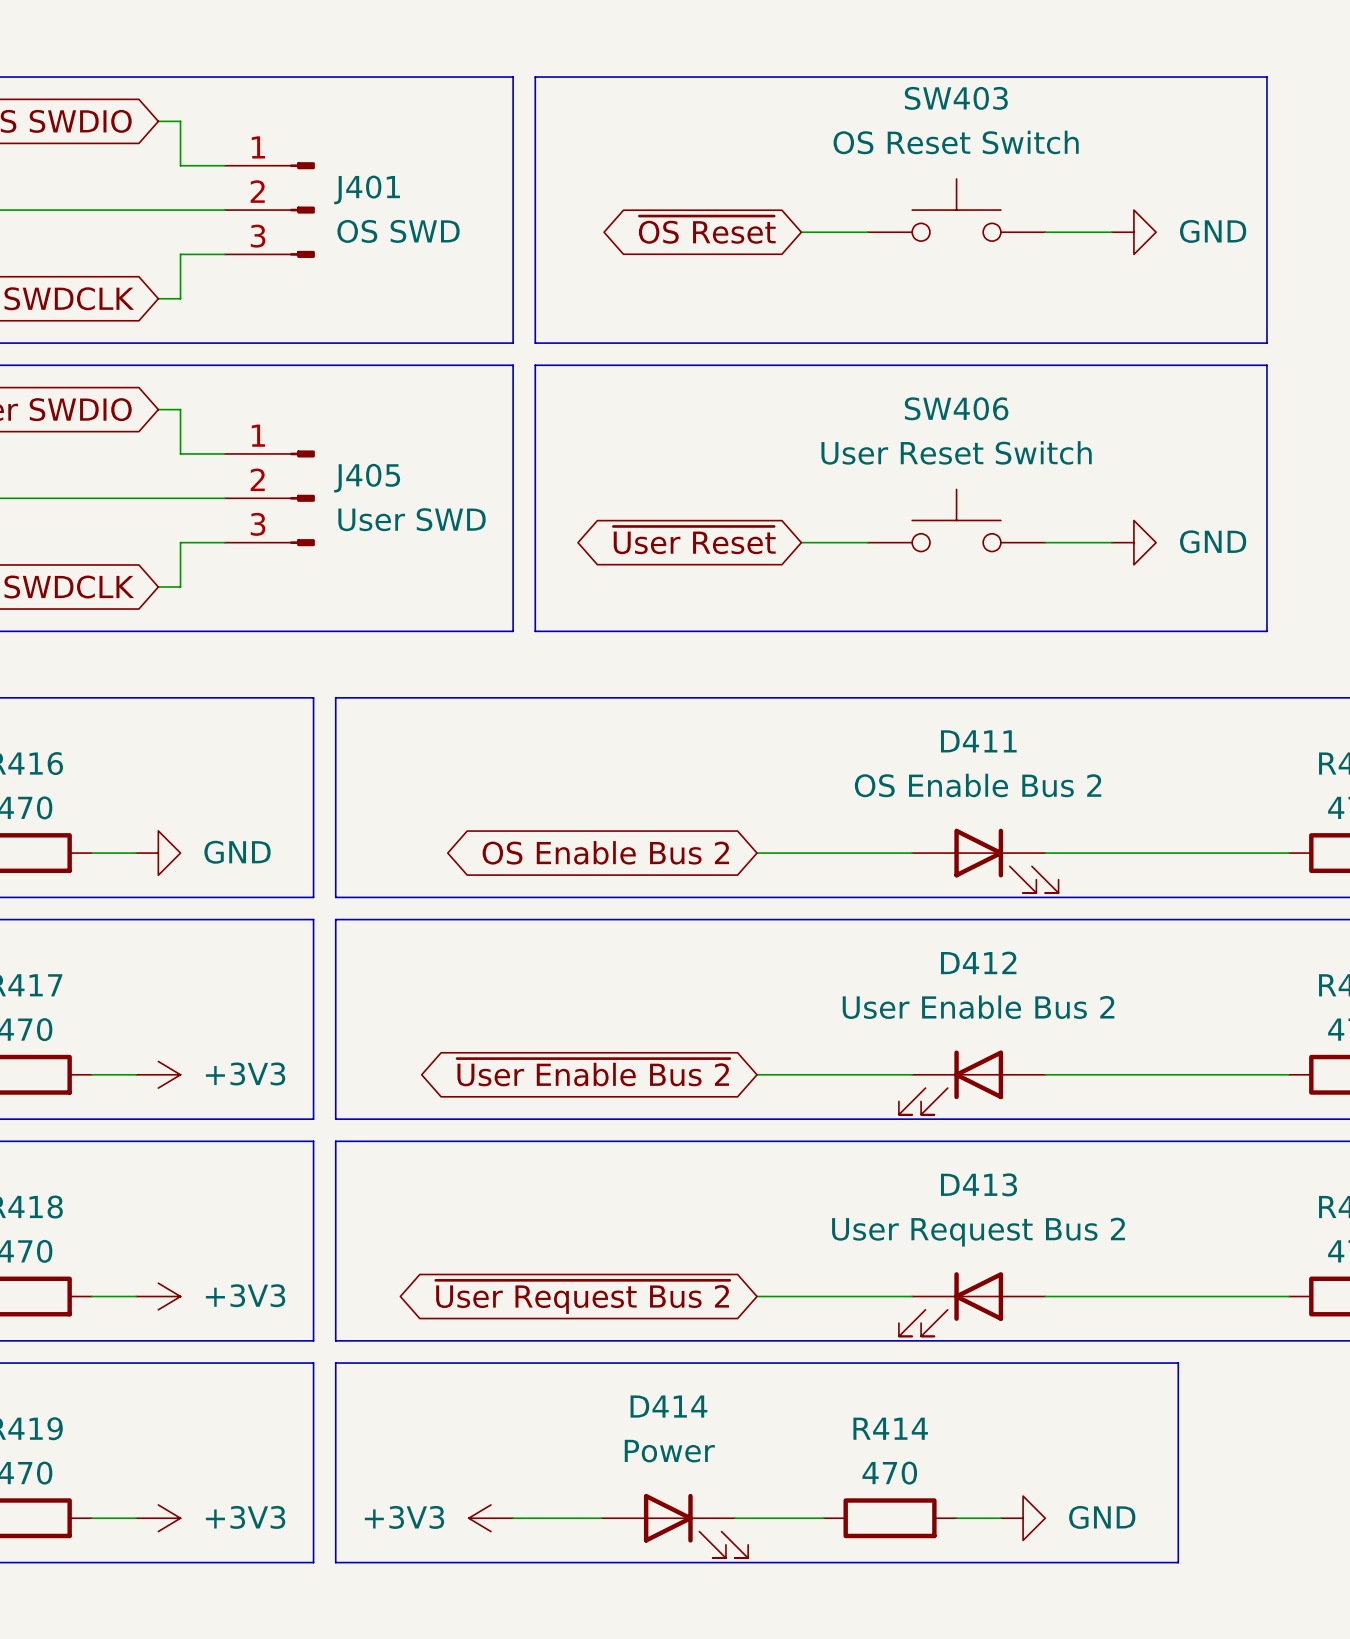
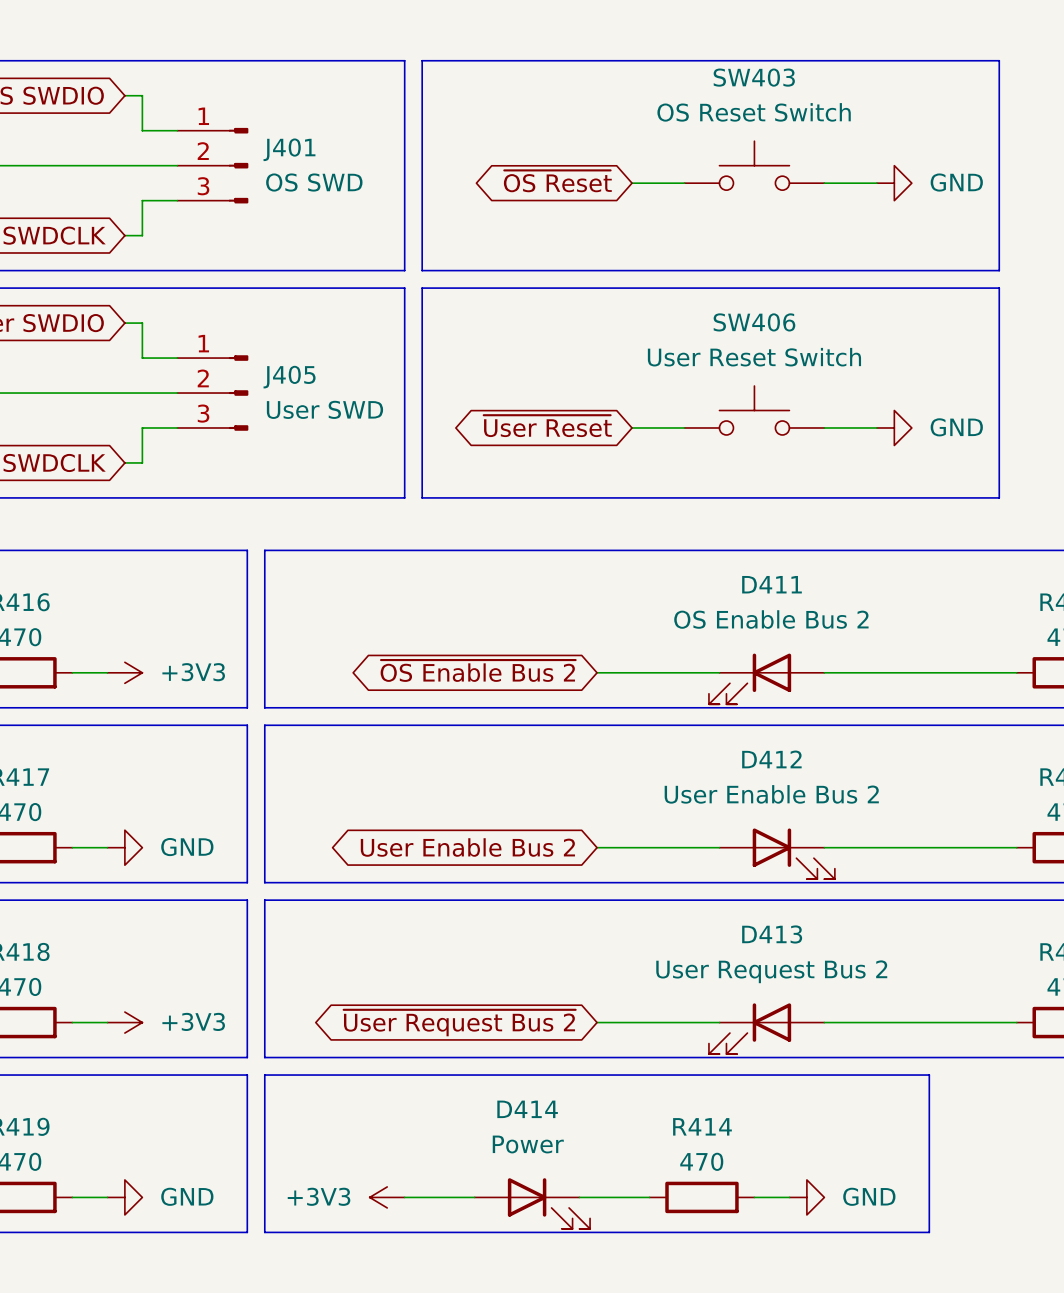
global label: OS Enable Bus 2 (605, 852) -> ~{OS Enable Bus 2} (478, 670)
power symbol: GND (158, 853) -> +3V3 (124, 672)
D411 flip: as is (1006, 860) -> left-right (750, 678)
global label: ~{User Enable Bus 2} (593, 1072) -> User Enable Bus 2 (467, 847)
power symbol: +3V3 (158, 1074) -> GND (124, 847)
D412 flip: as is (951, 1082) -> left-right (793, 853)
power symbol: +3V3 (158, 1518) -> GND (124, 1197)

